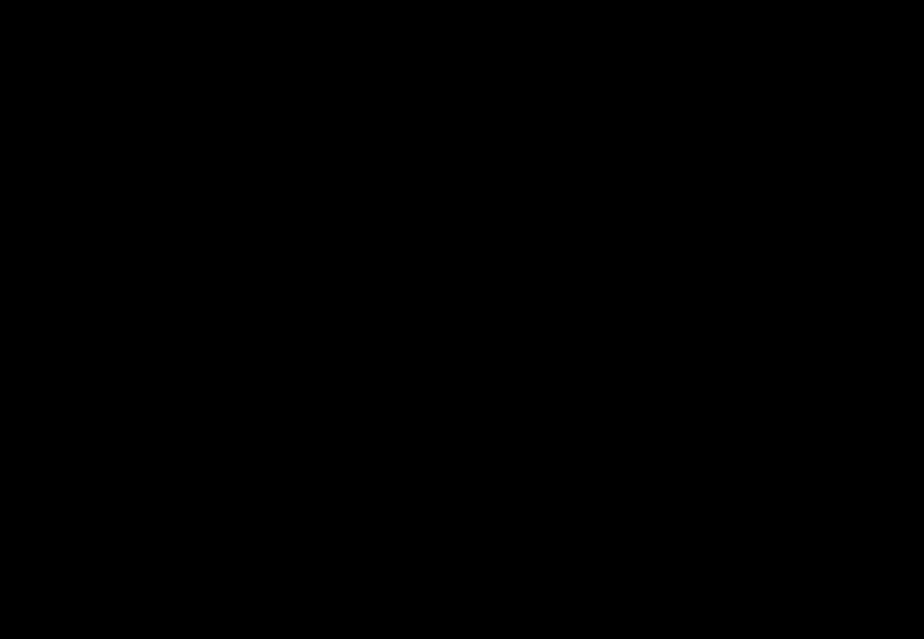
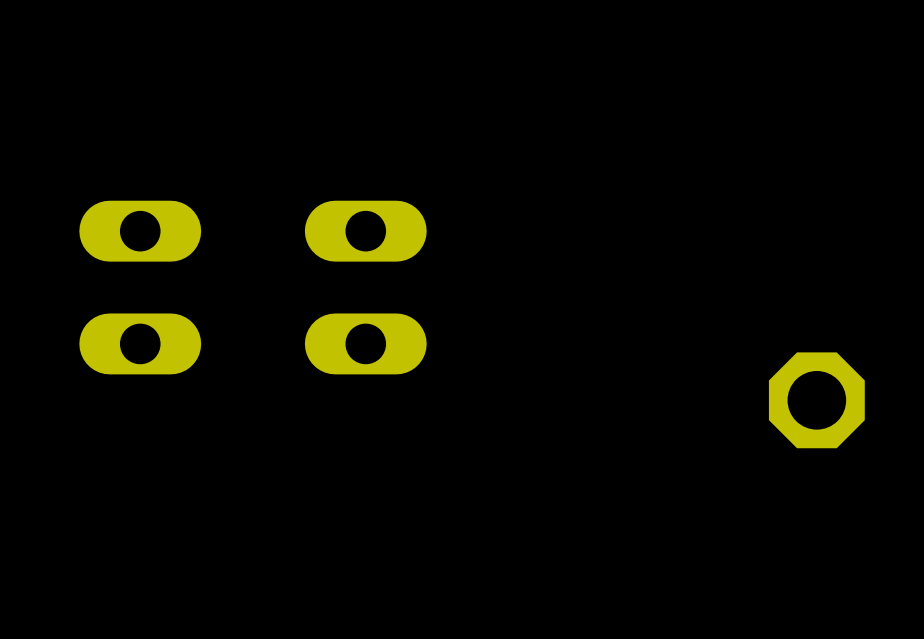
part: none -> (140, 287)
part: none -> (365, 287)
part: none -> (816, 400)

